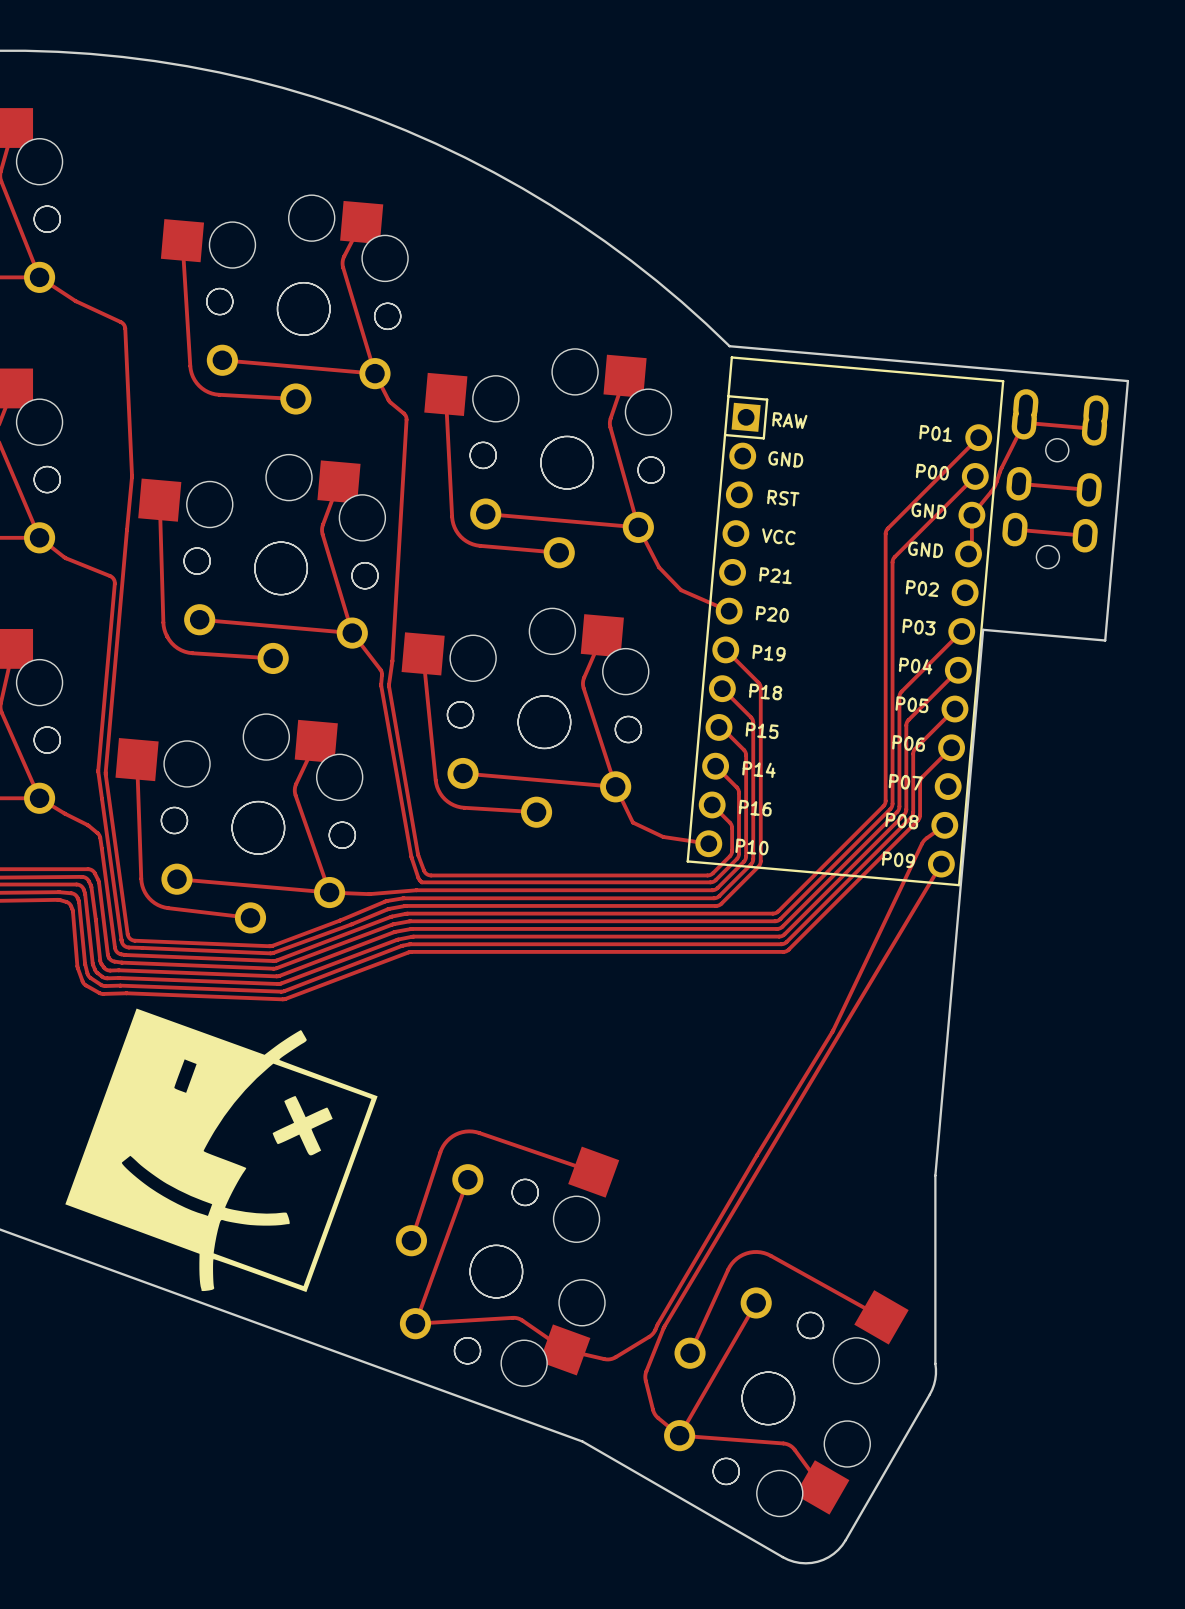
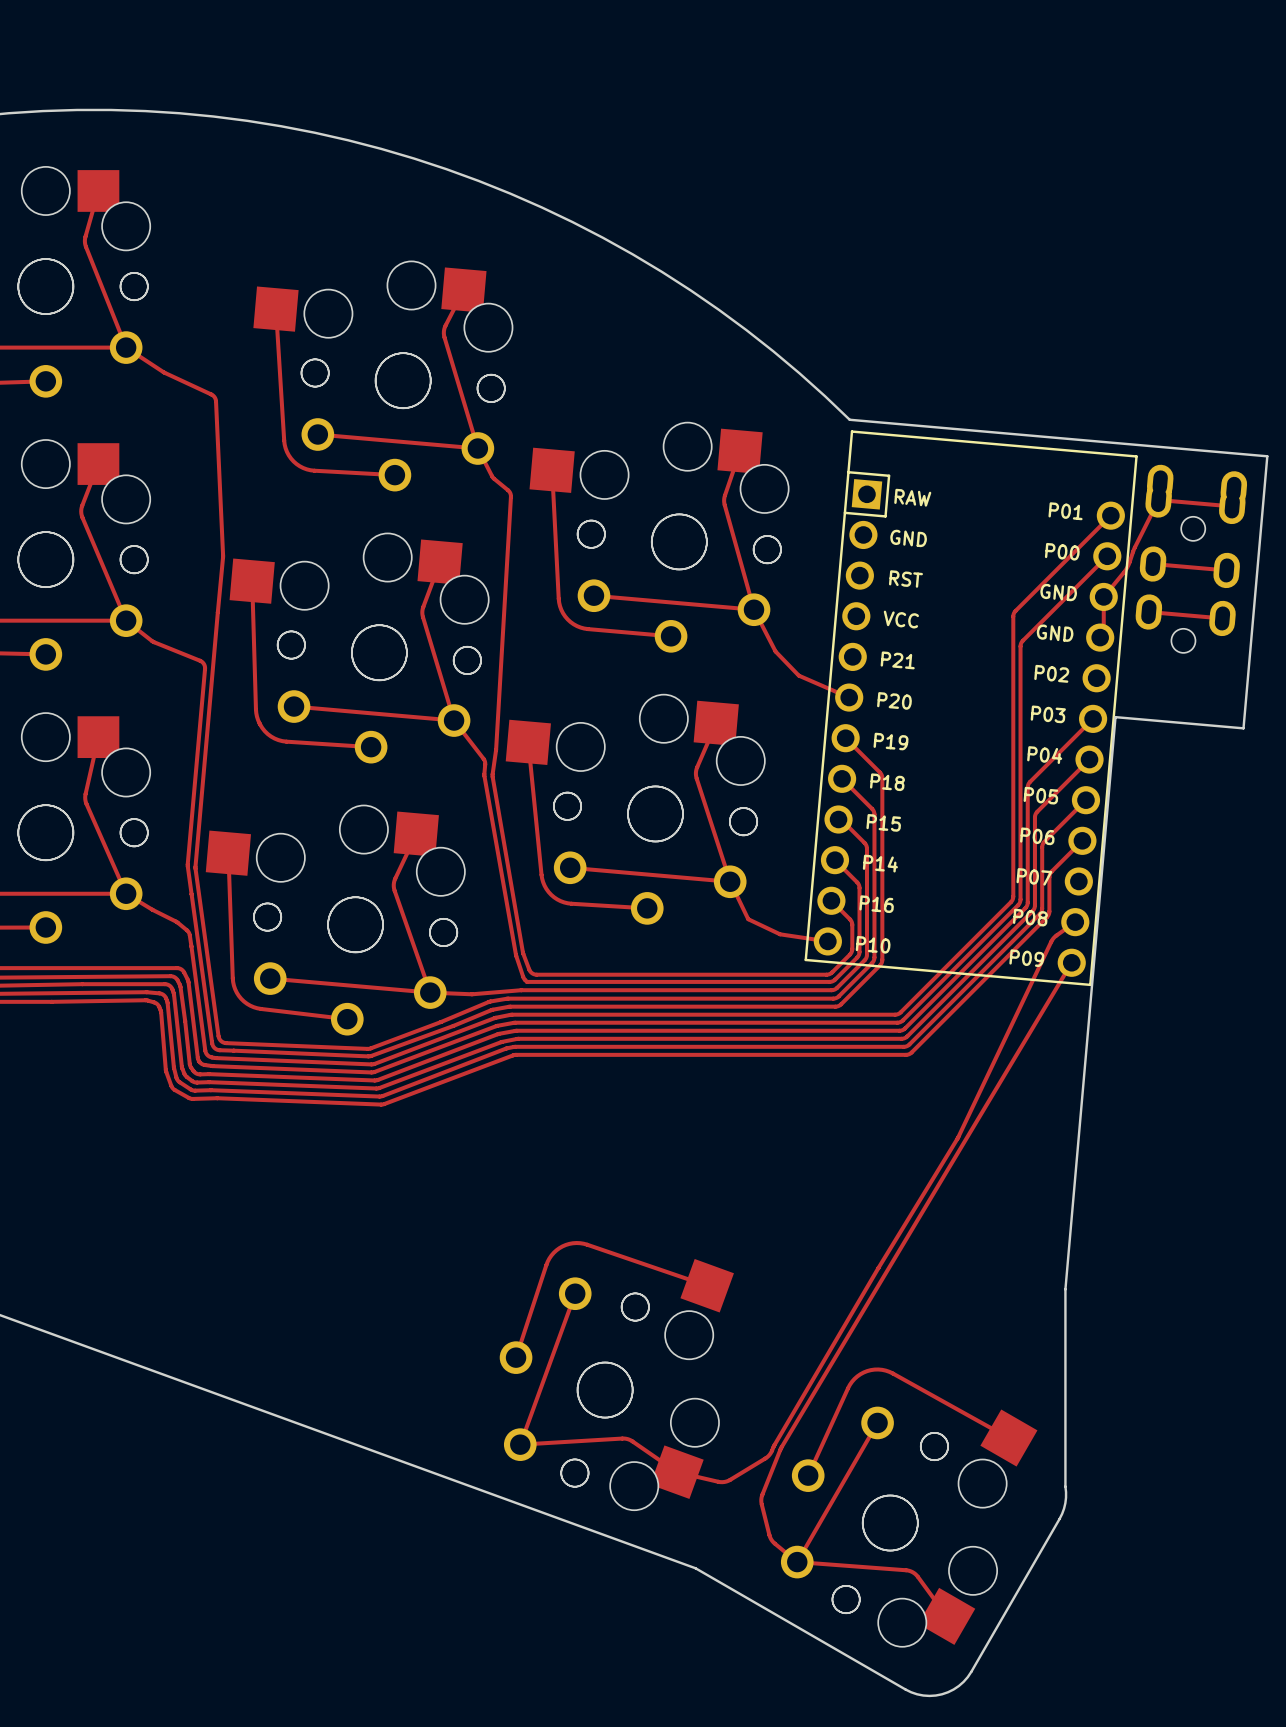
drawing: [65, 1008, 378, 1293] -> none

